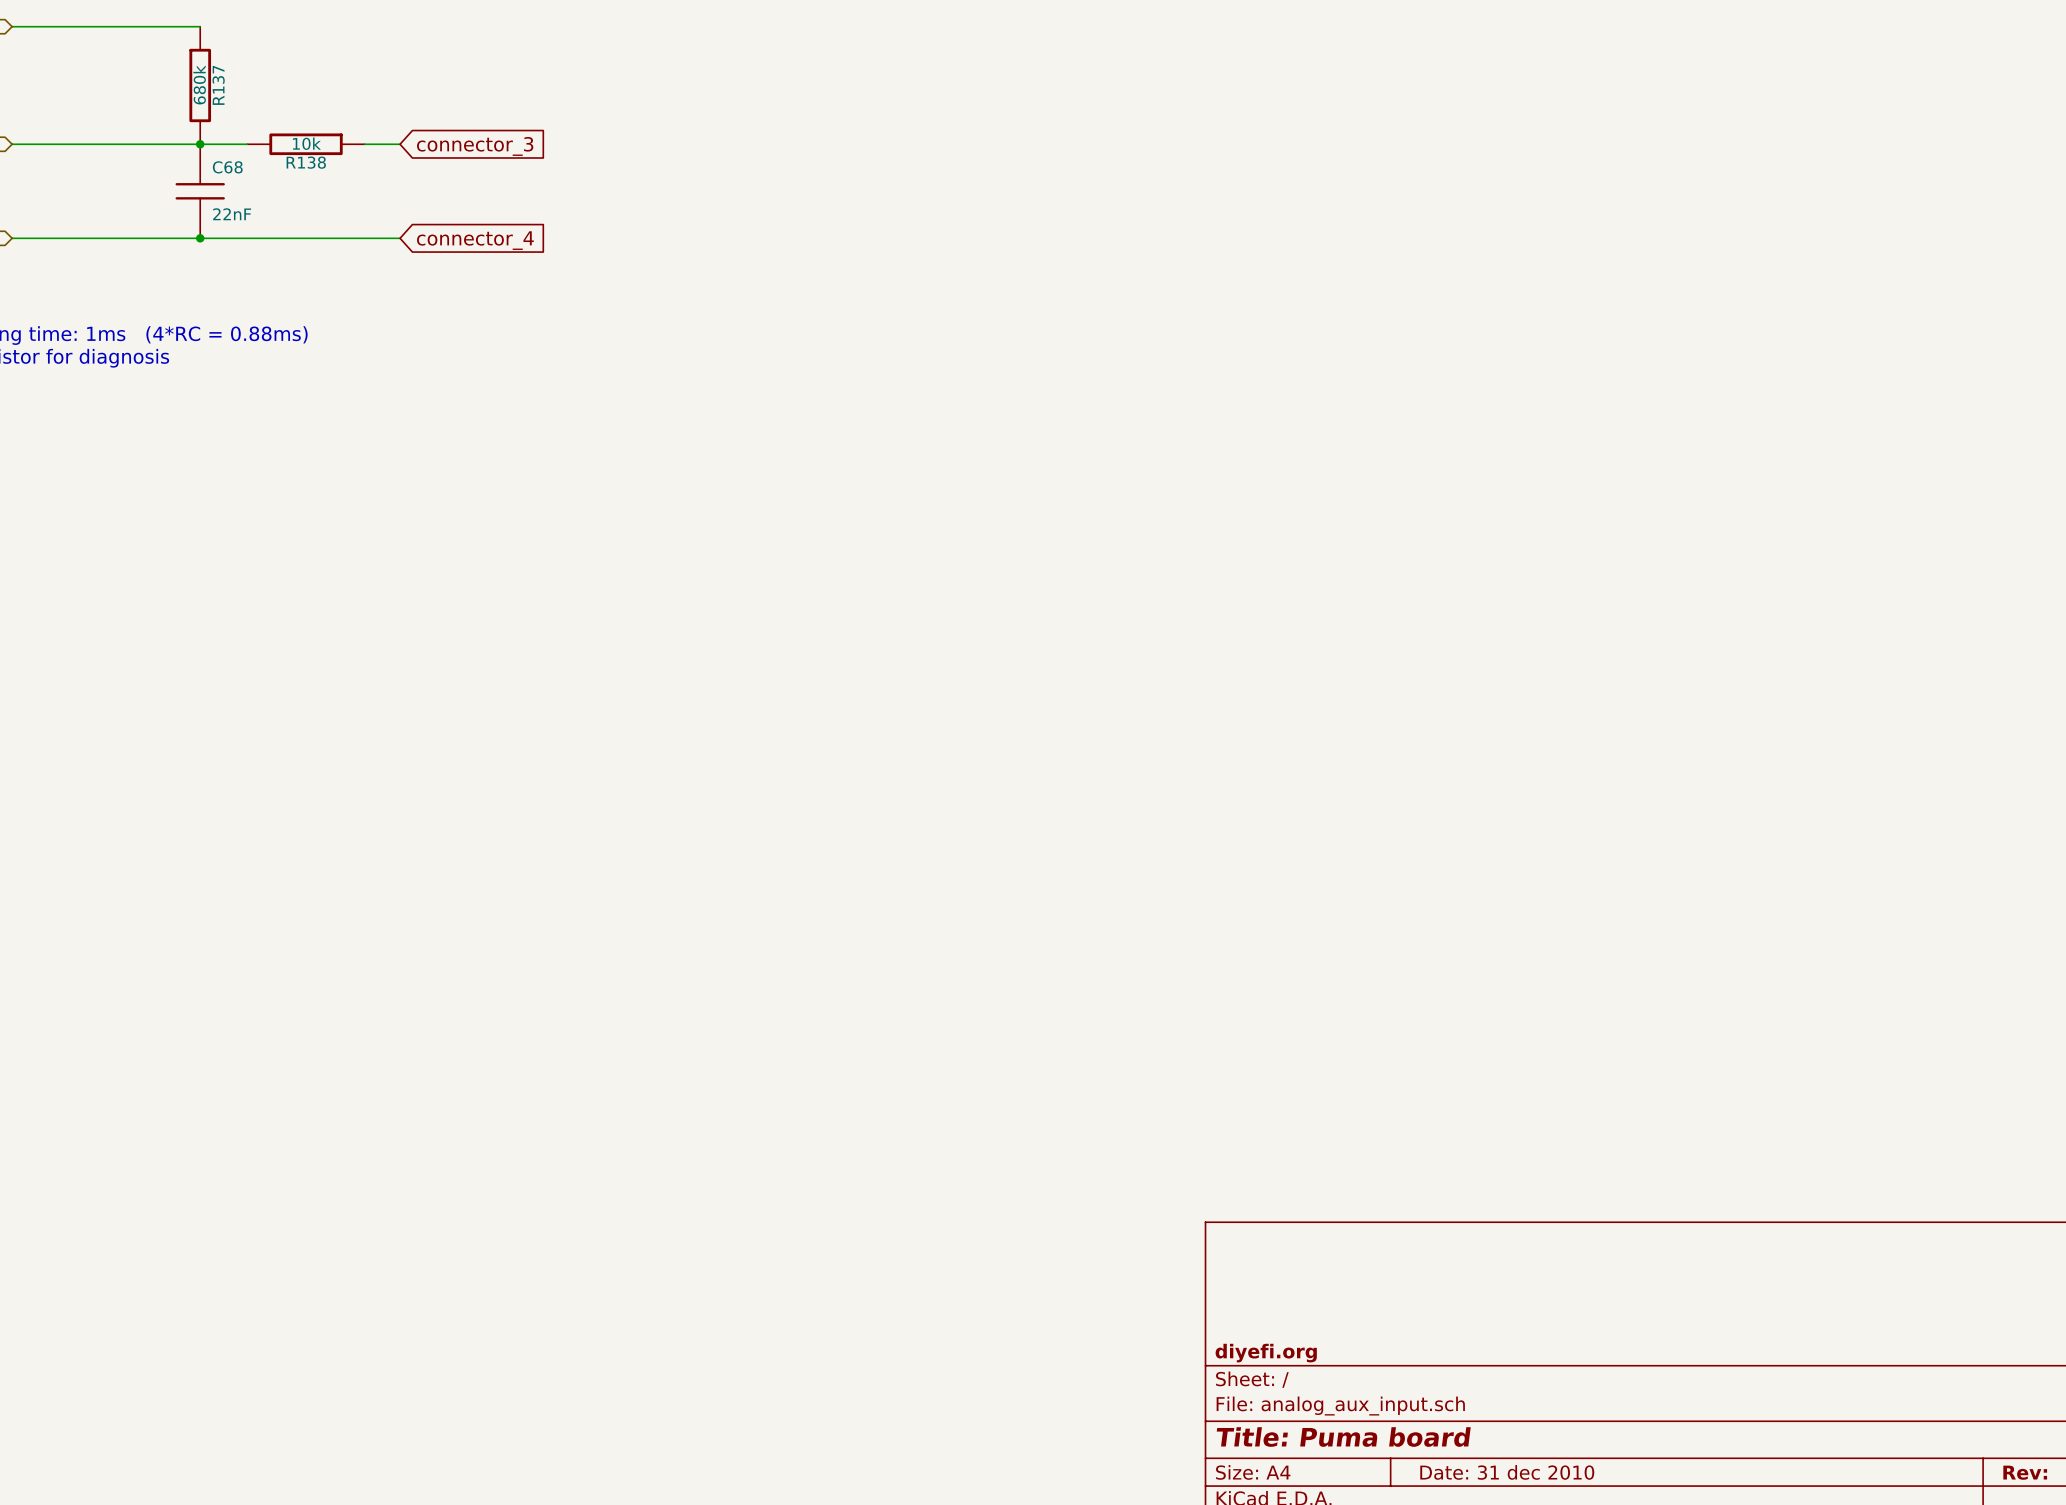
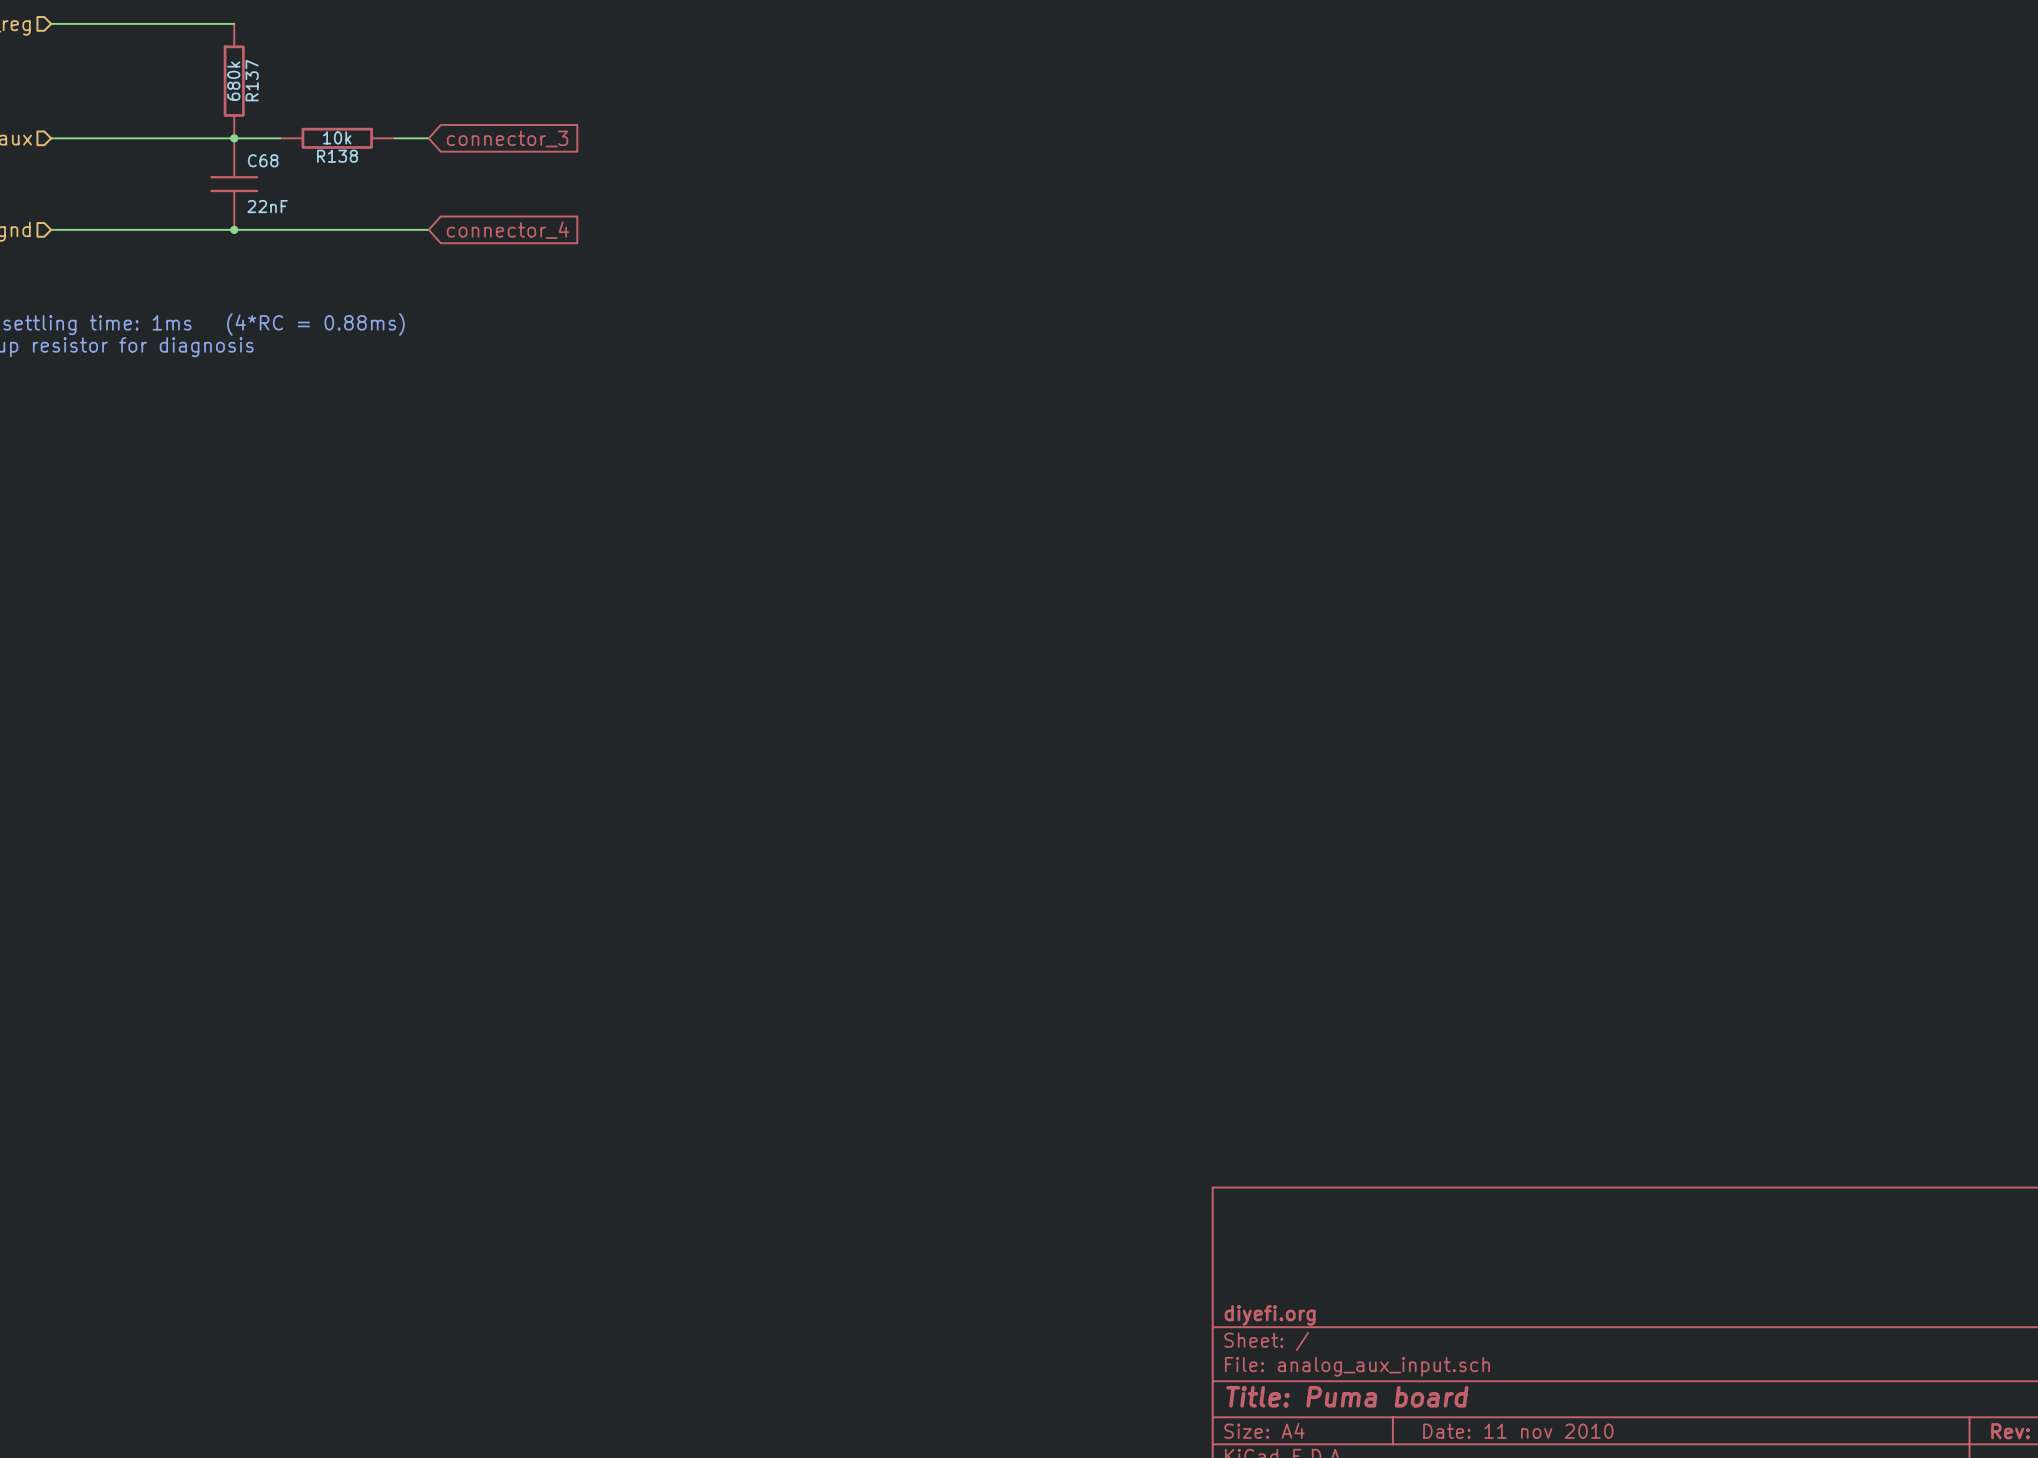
title block: Date: 31 dec 2010 (1507, 1472) -> Date: 11 nov 2010 (1518, 1431)

